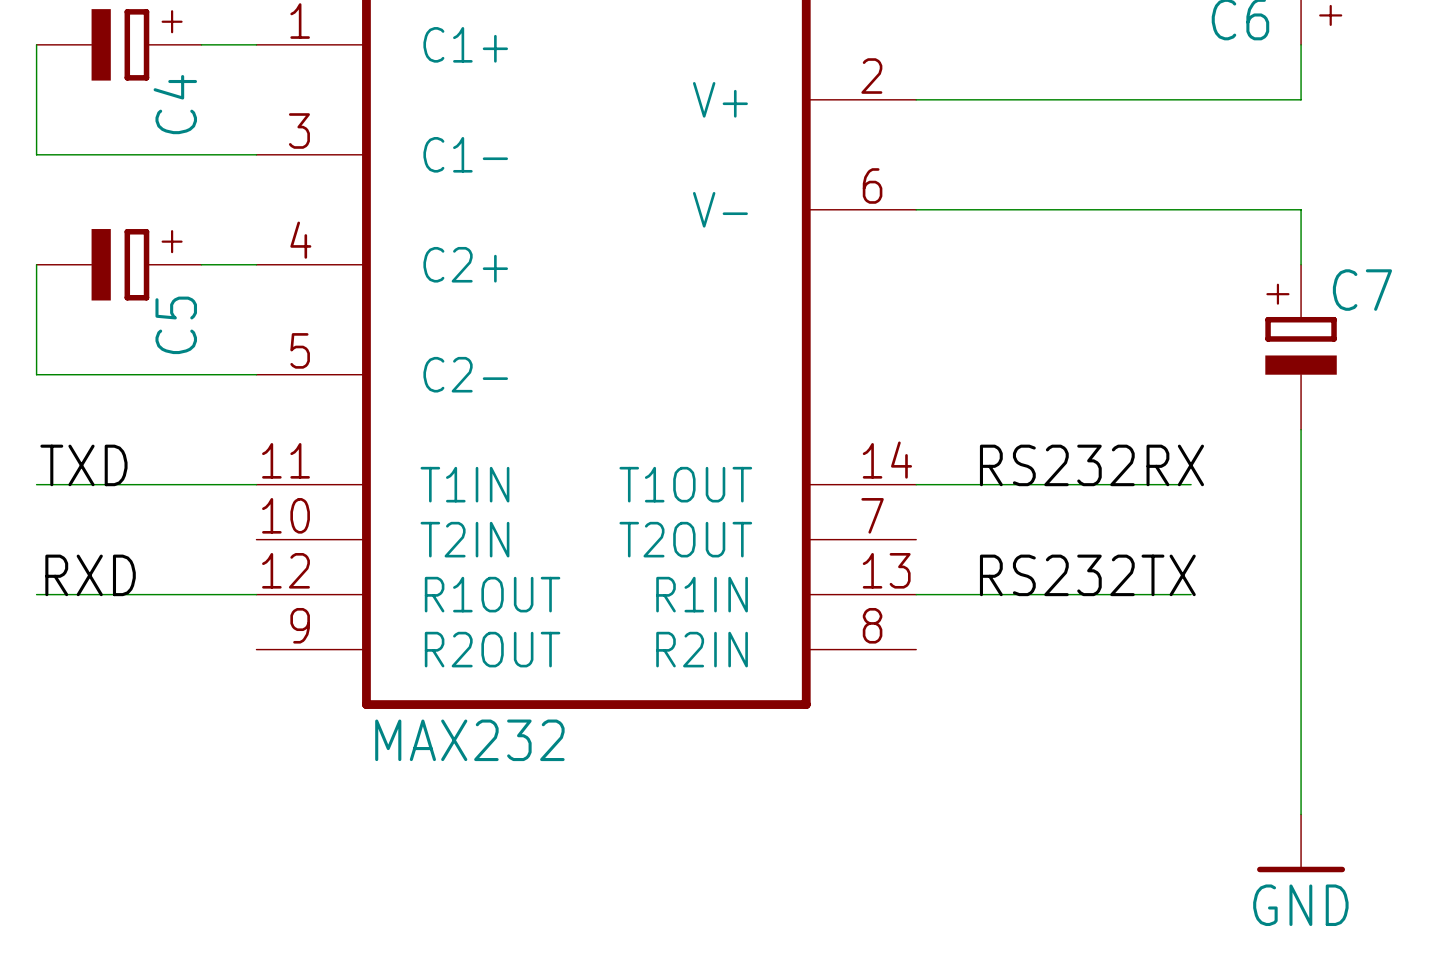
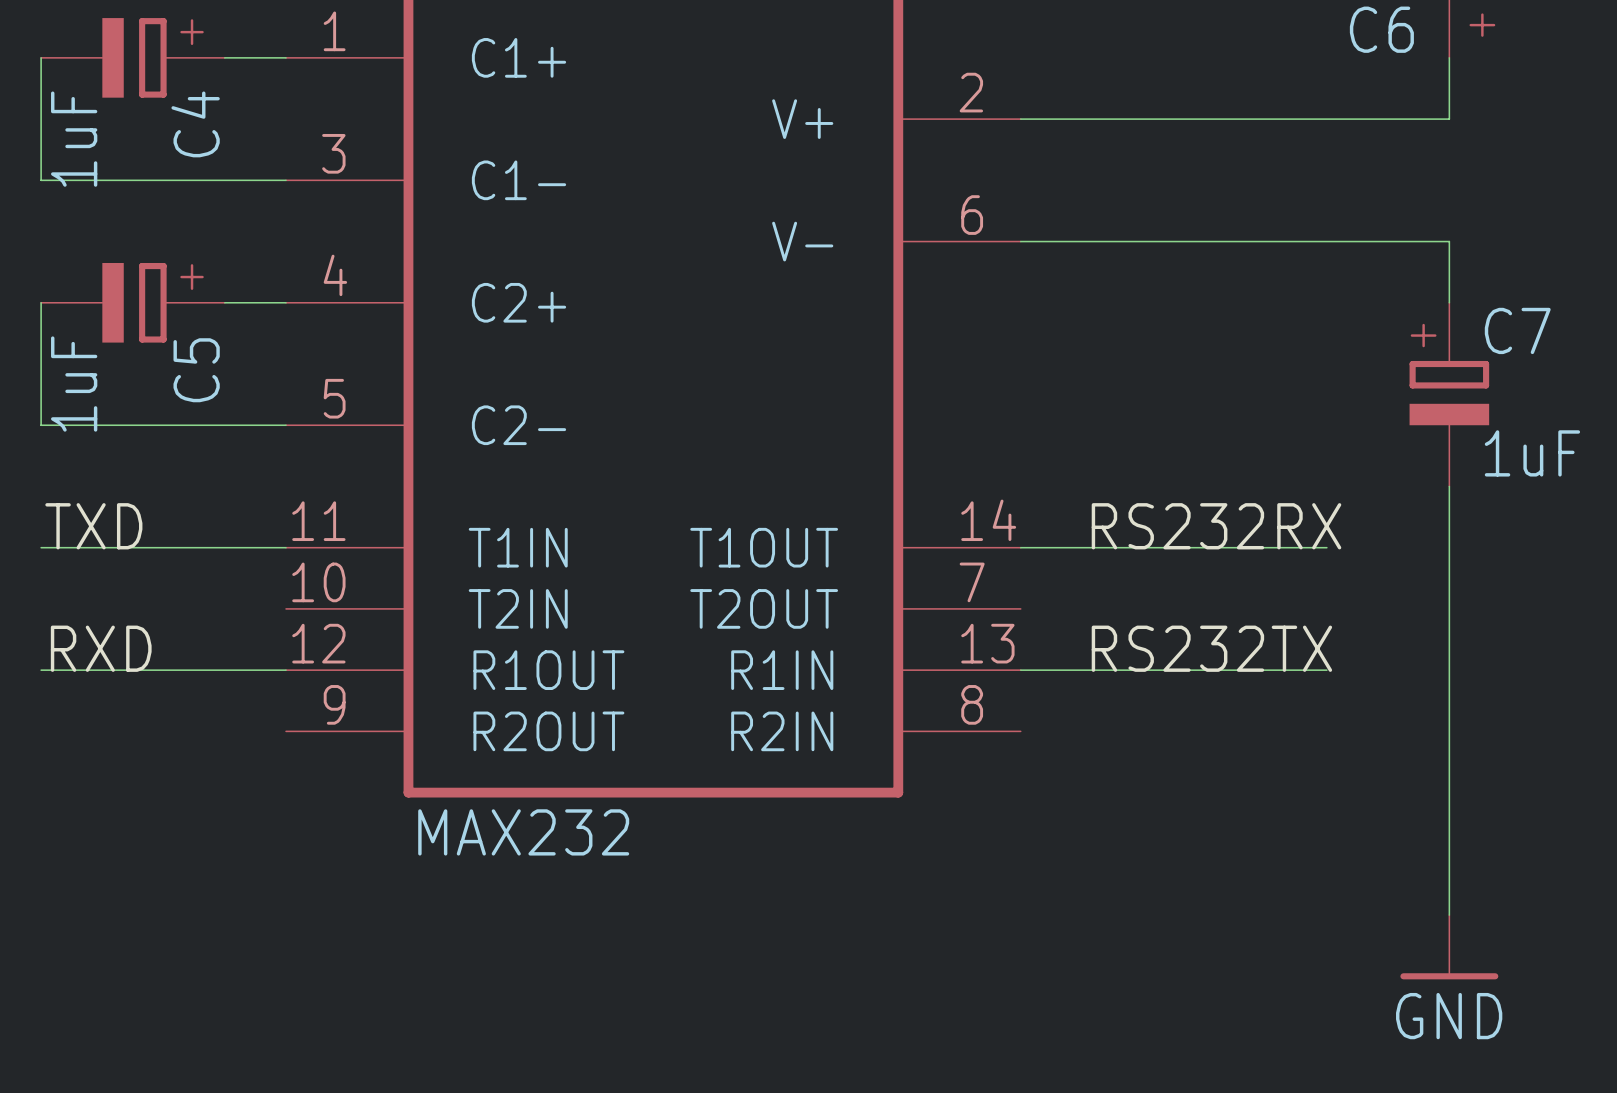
C4 value: none -> 1uF (74, 139)
C5 value: none -> 1uF (74, 384)
C7 value: none -> 1uF (1532, 453)

